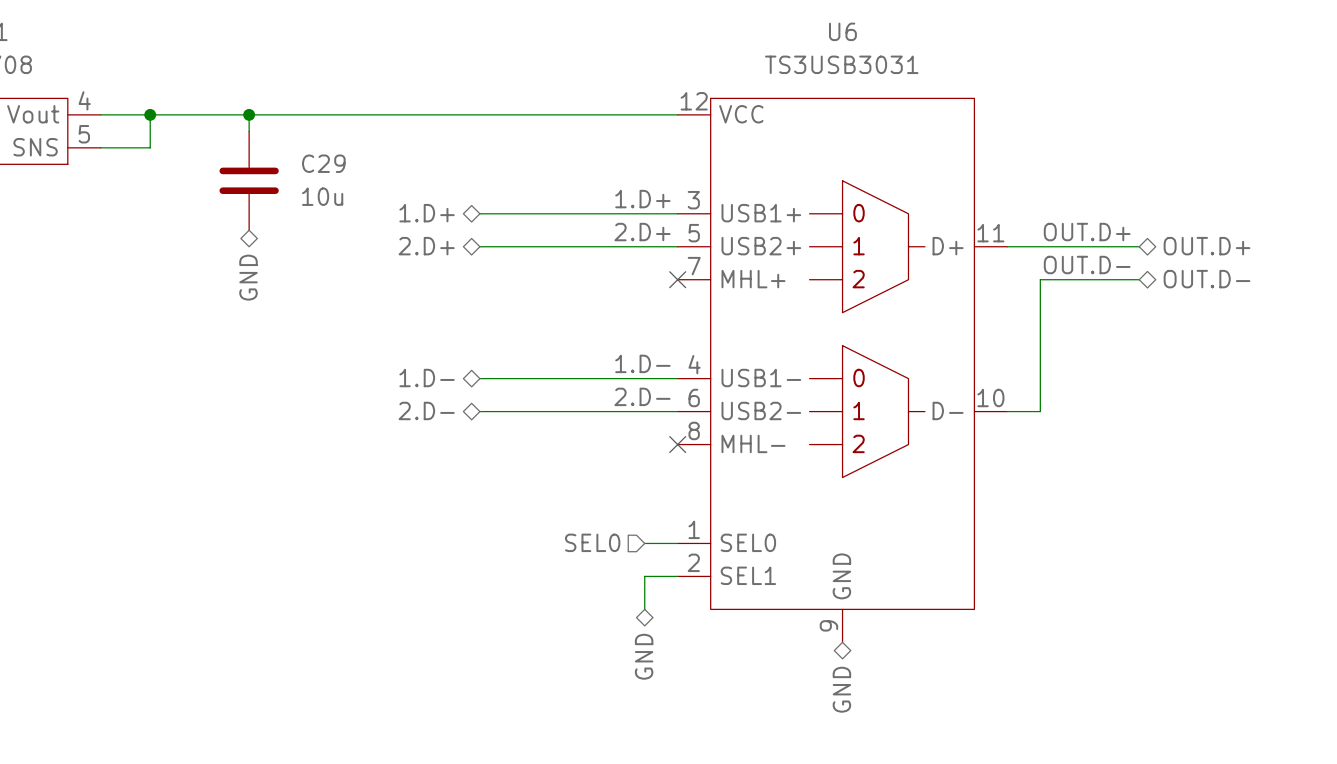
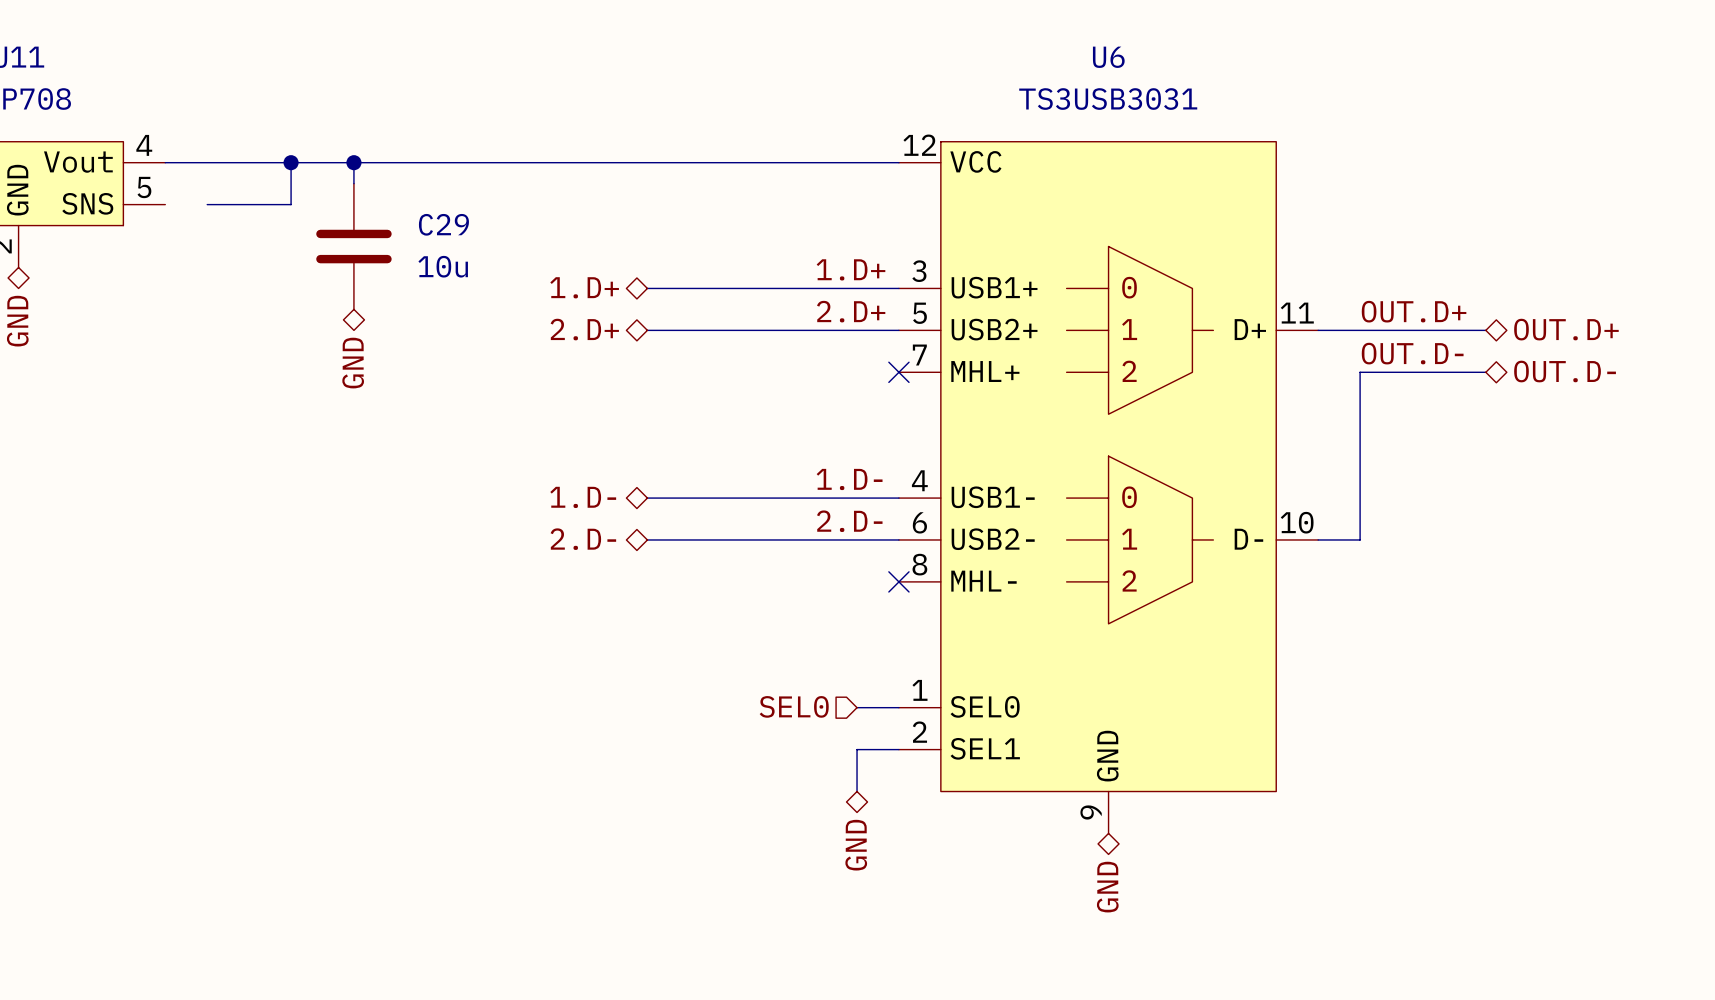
wire: (150, 114) (150, 147) -> (291, 162) (291, 204) (228, 204)
junction position: (150, 114) -> (291, 162)
wire: (100, 147) (133, 147) -> none

